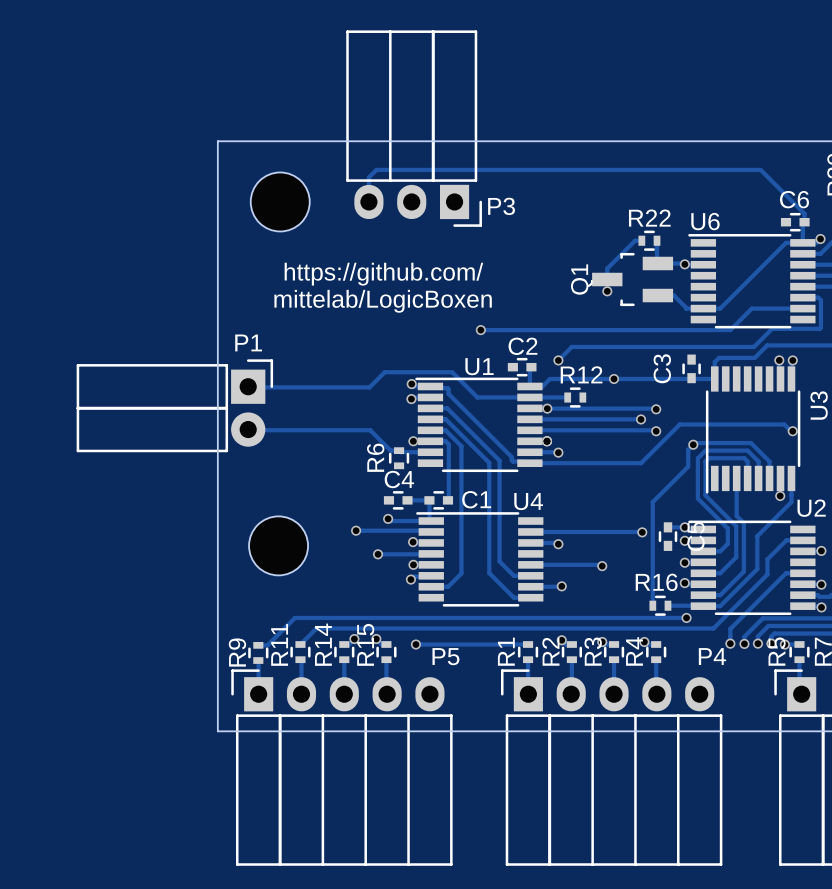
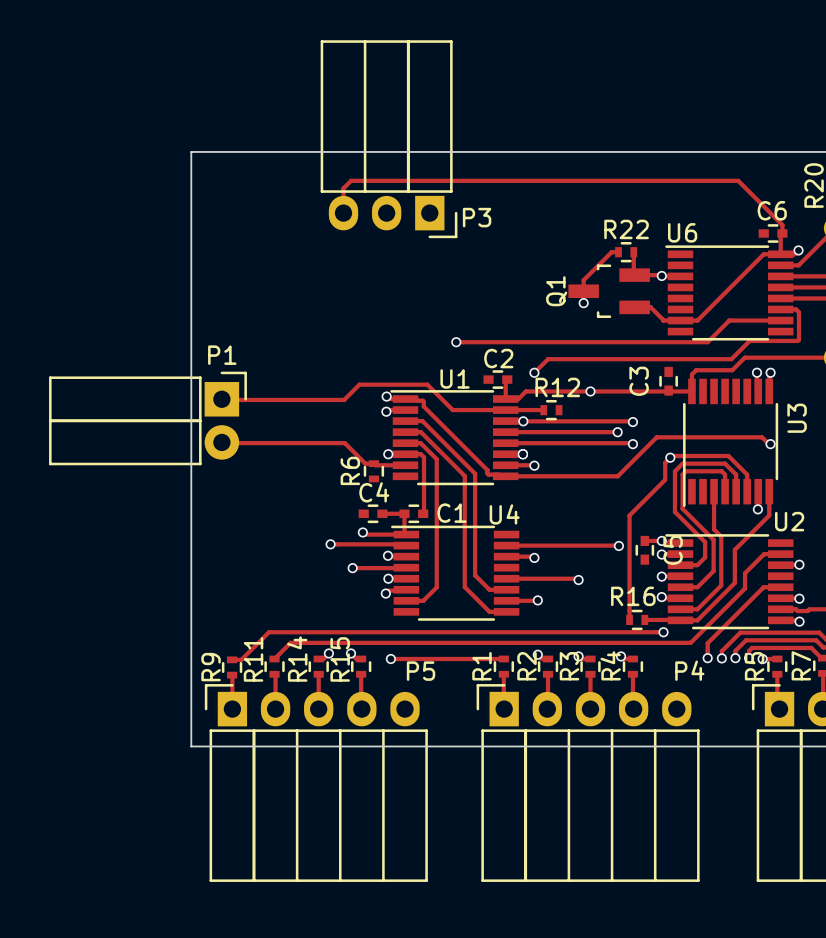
part: (280, 201) -> none
text: https://github.com/ (383, 274) -> none
text: mittelab/LogicBoxen (383, 301) -> none
part: (278, 545) -> none

